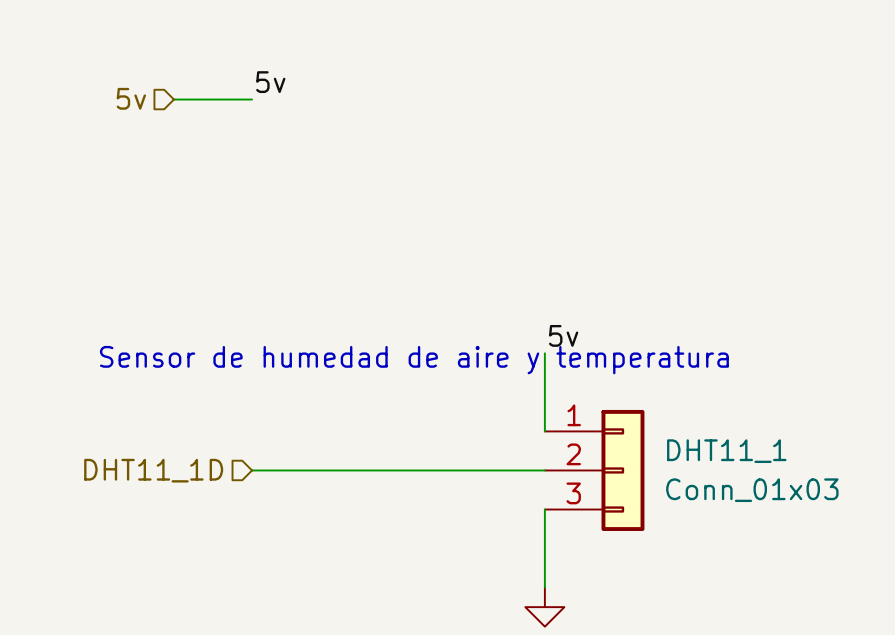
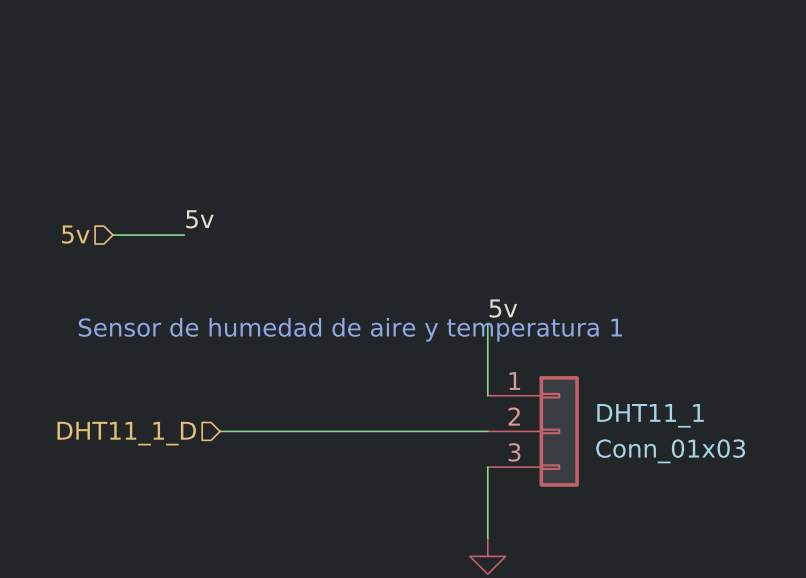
label position: 5v (270, 82) -> 5v (199, 219)
hierarchical label position: 5v (131, 98) -> 5v (75, 234)
wire: (173, 99) (252, 99) -> (112, 235) (184, 235)
text: Sensor de humedad de aire y temperatura (414, 360) -> Sensor de humedad de aire y temperatura 1 (350, 329)
hierarchical label: DHT11_1D (153, 470) -> DHT11_1_D (126, 433)

